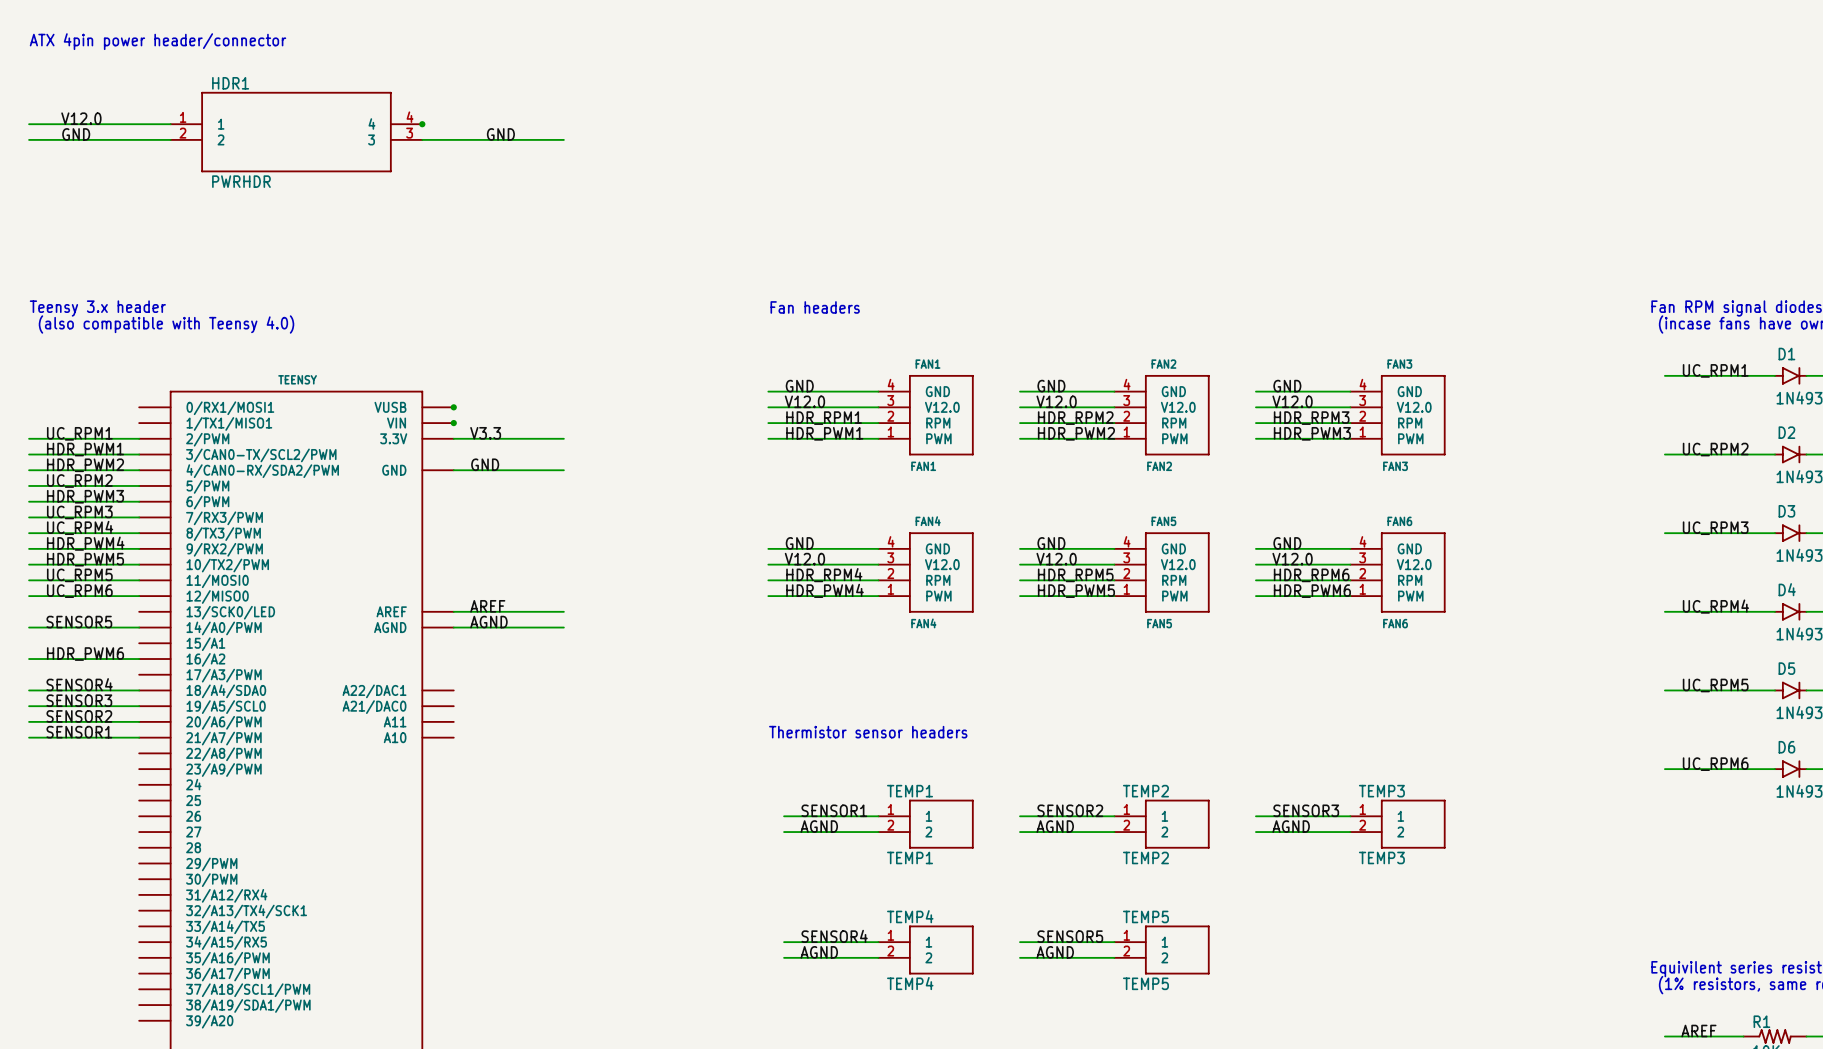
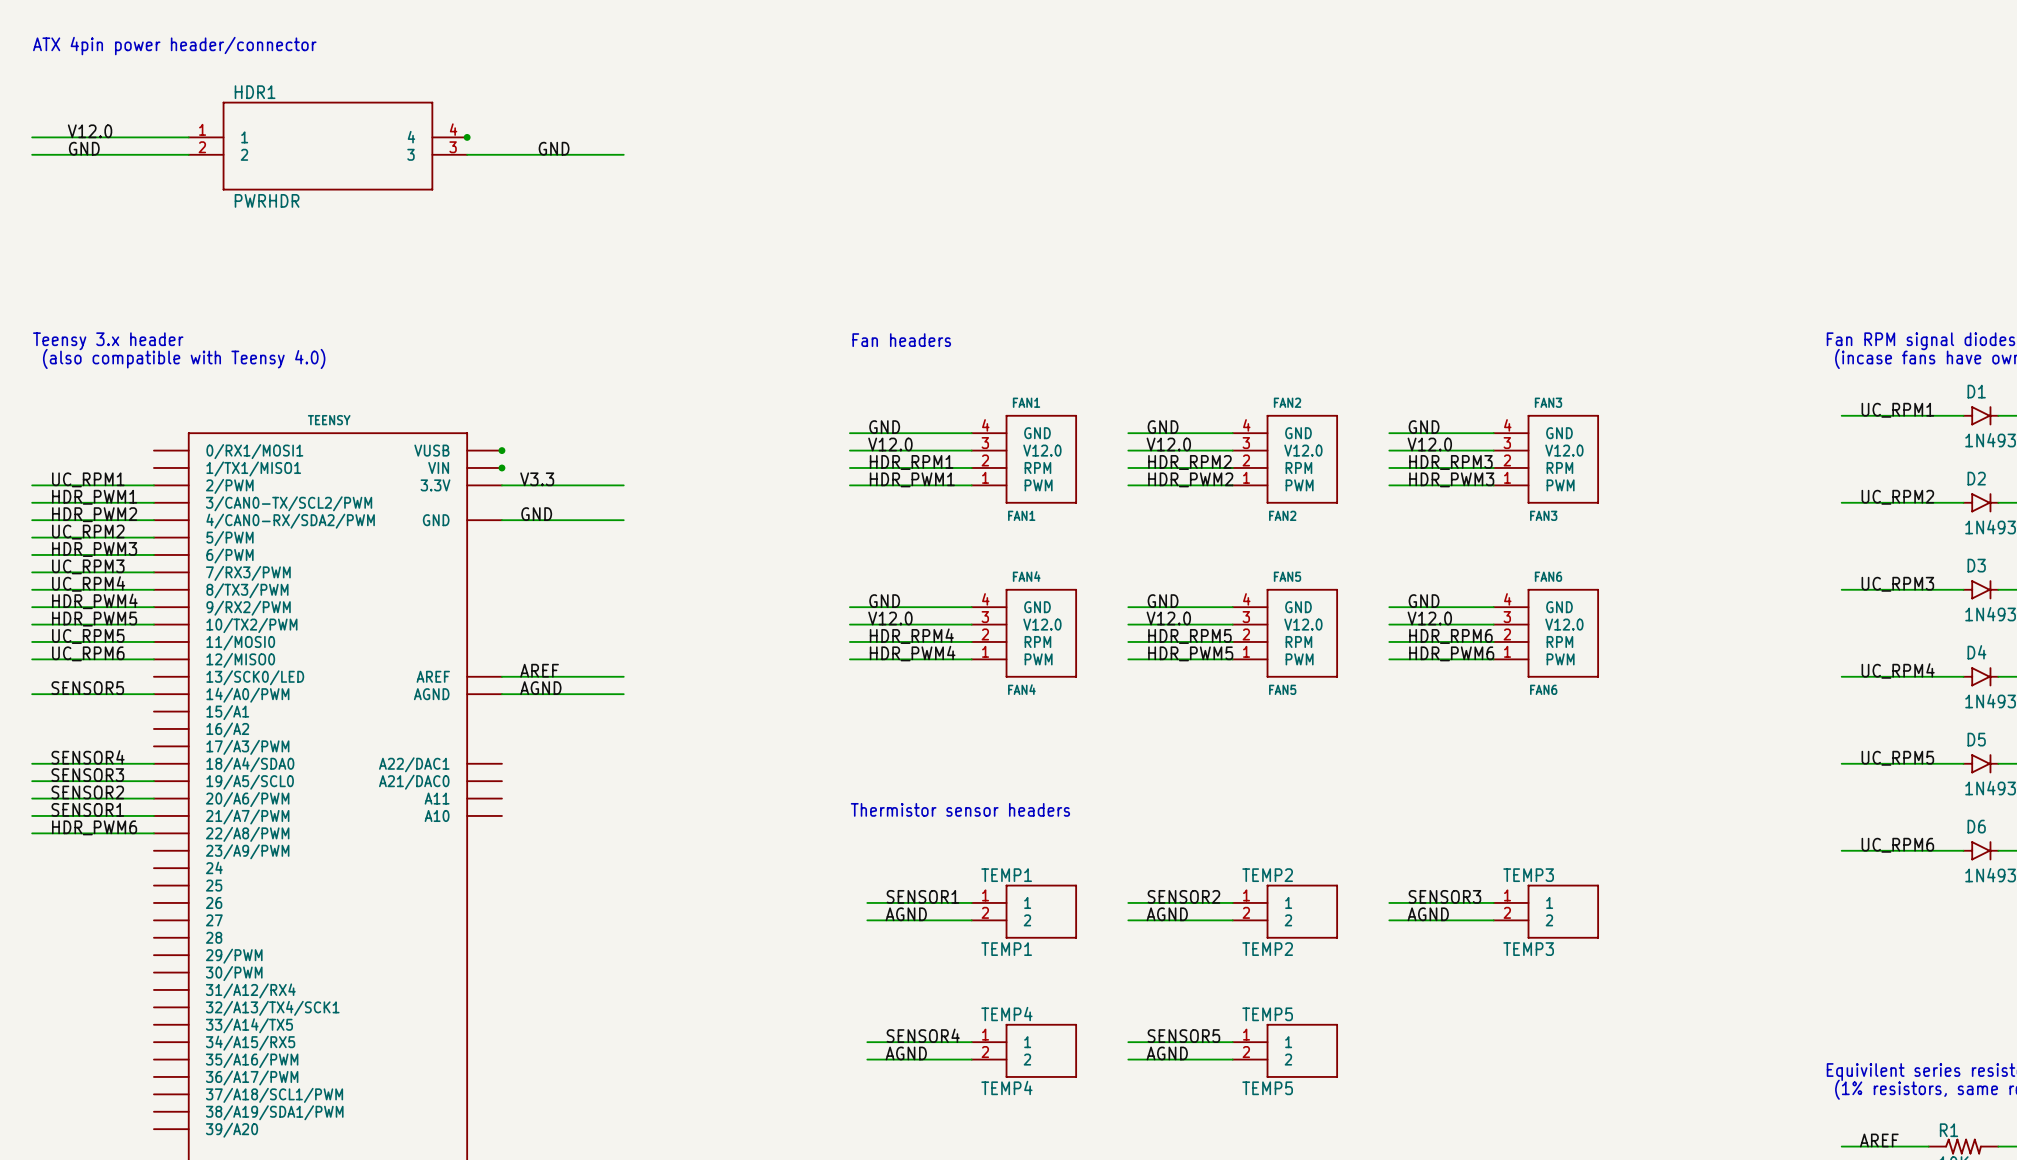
label position: HDR_PWM6 (85, 654) -> HDR_PWM6 (94, 827)
wire: (29, 659) (139, 659) -> (32, 833) (153, 833)

